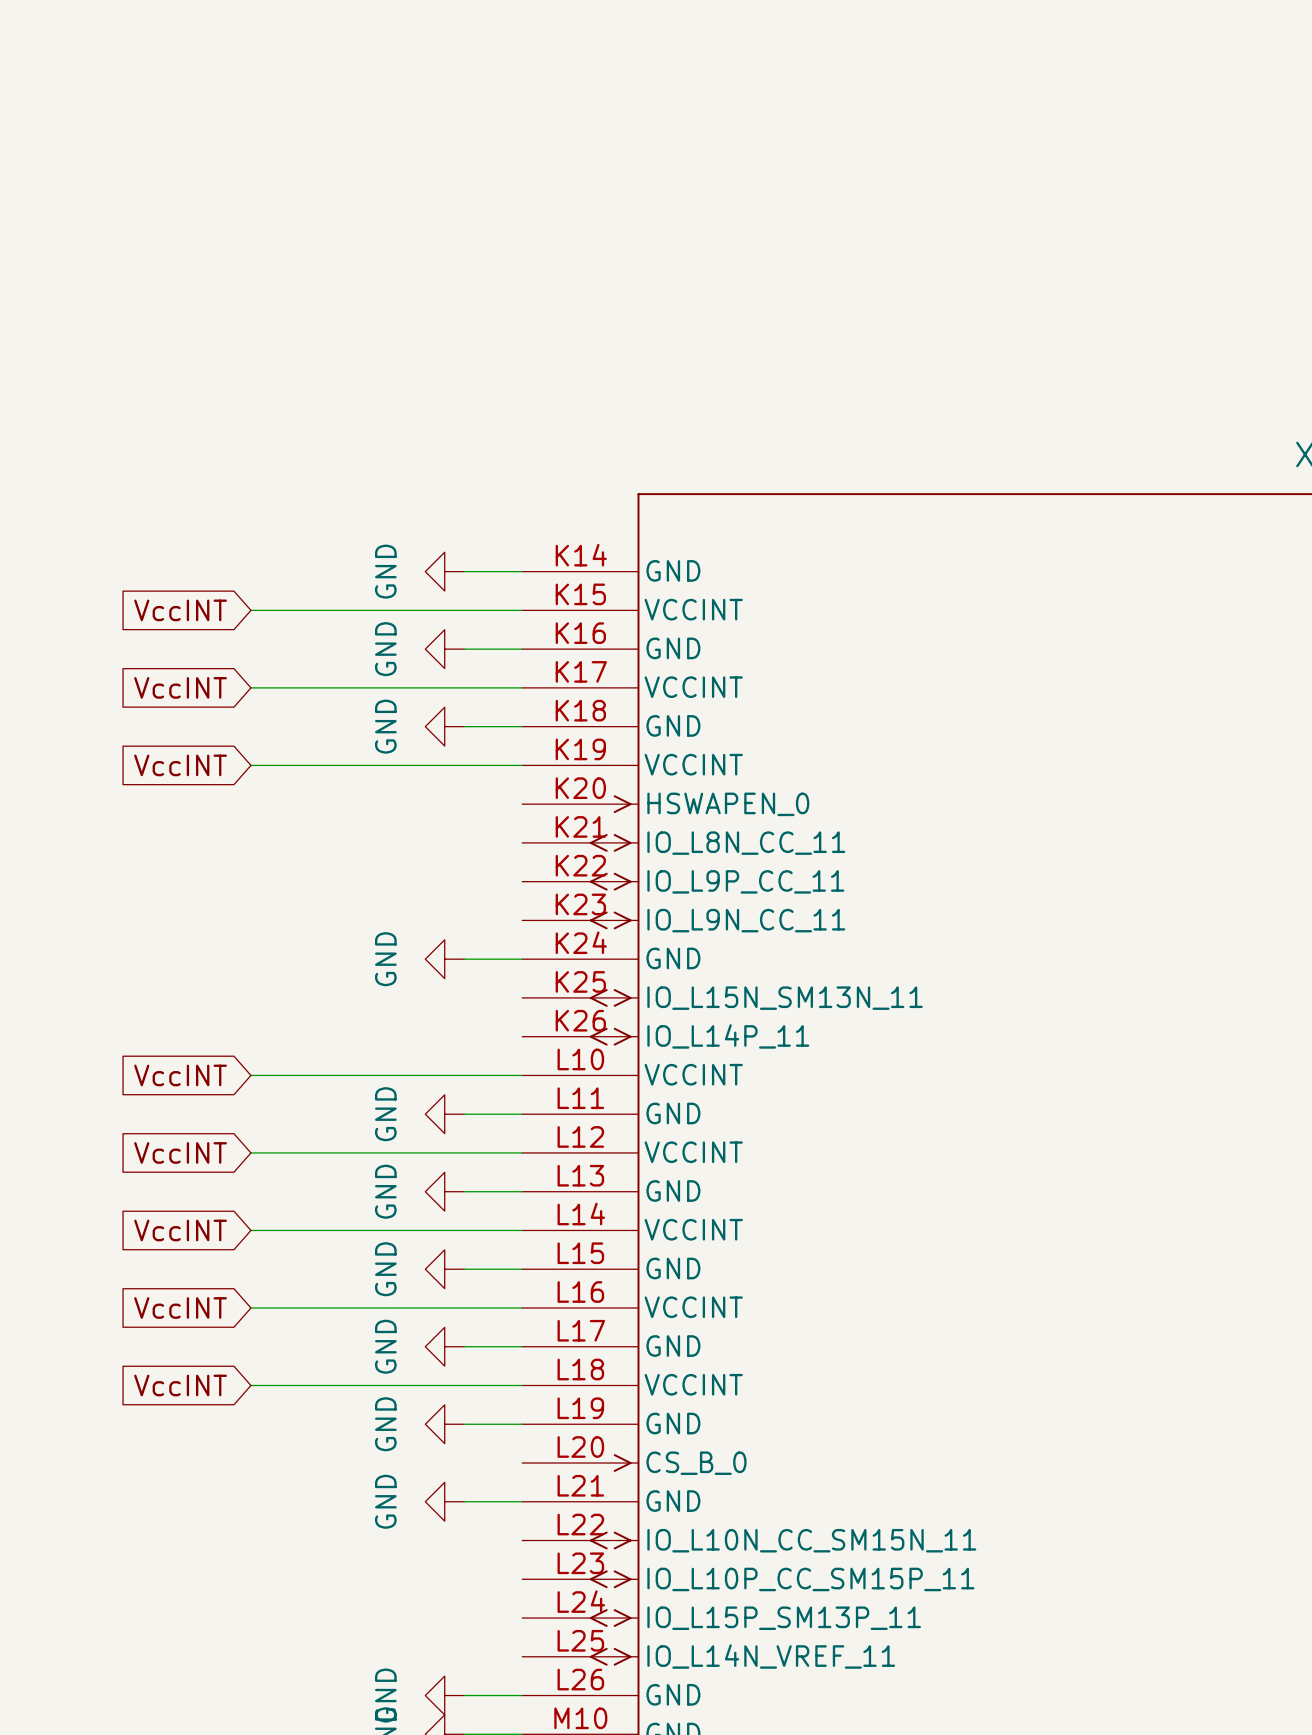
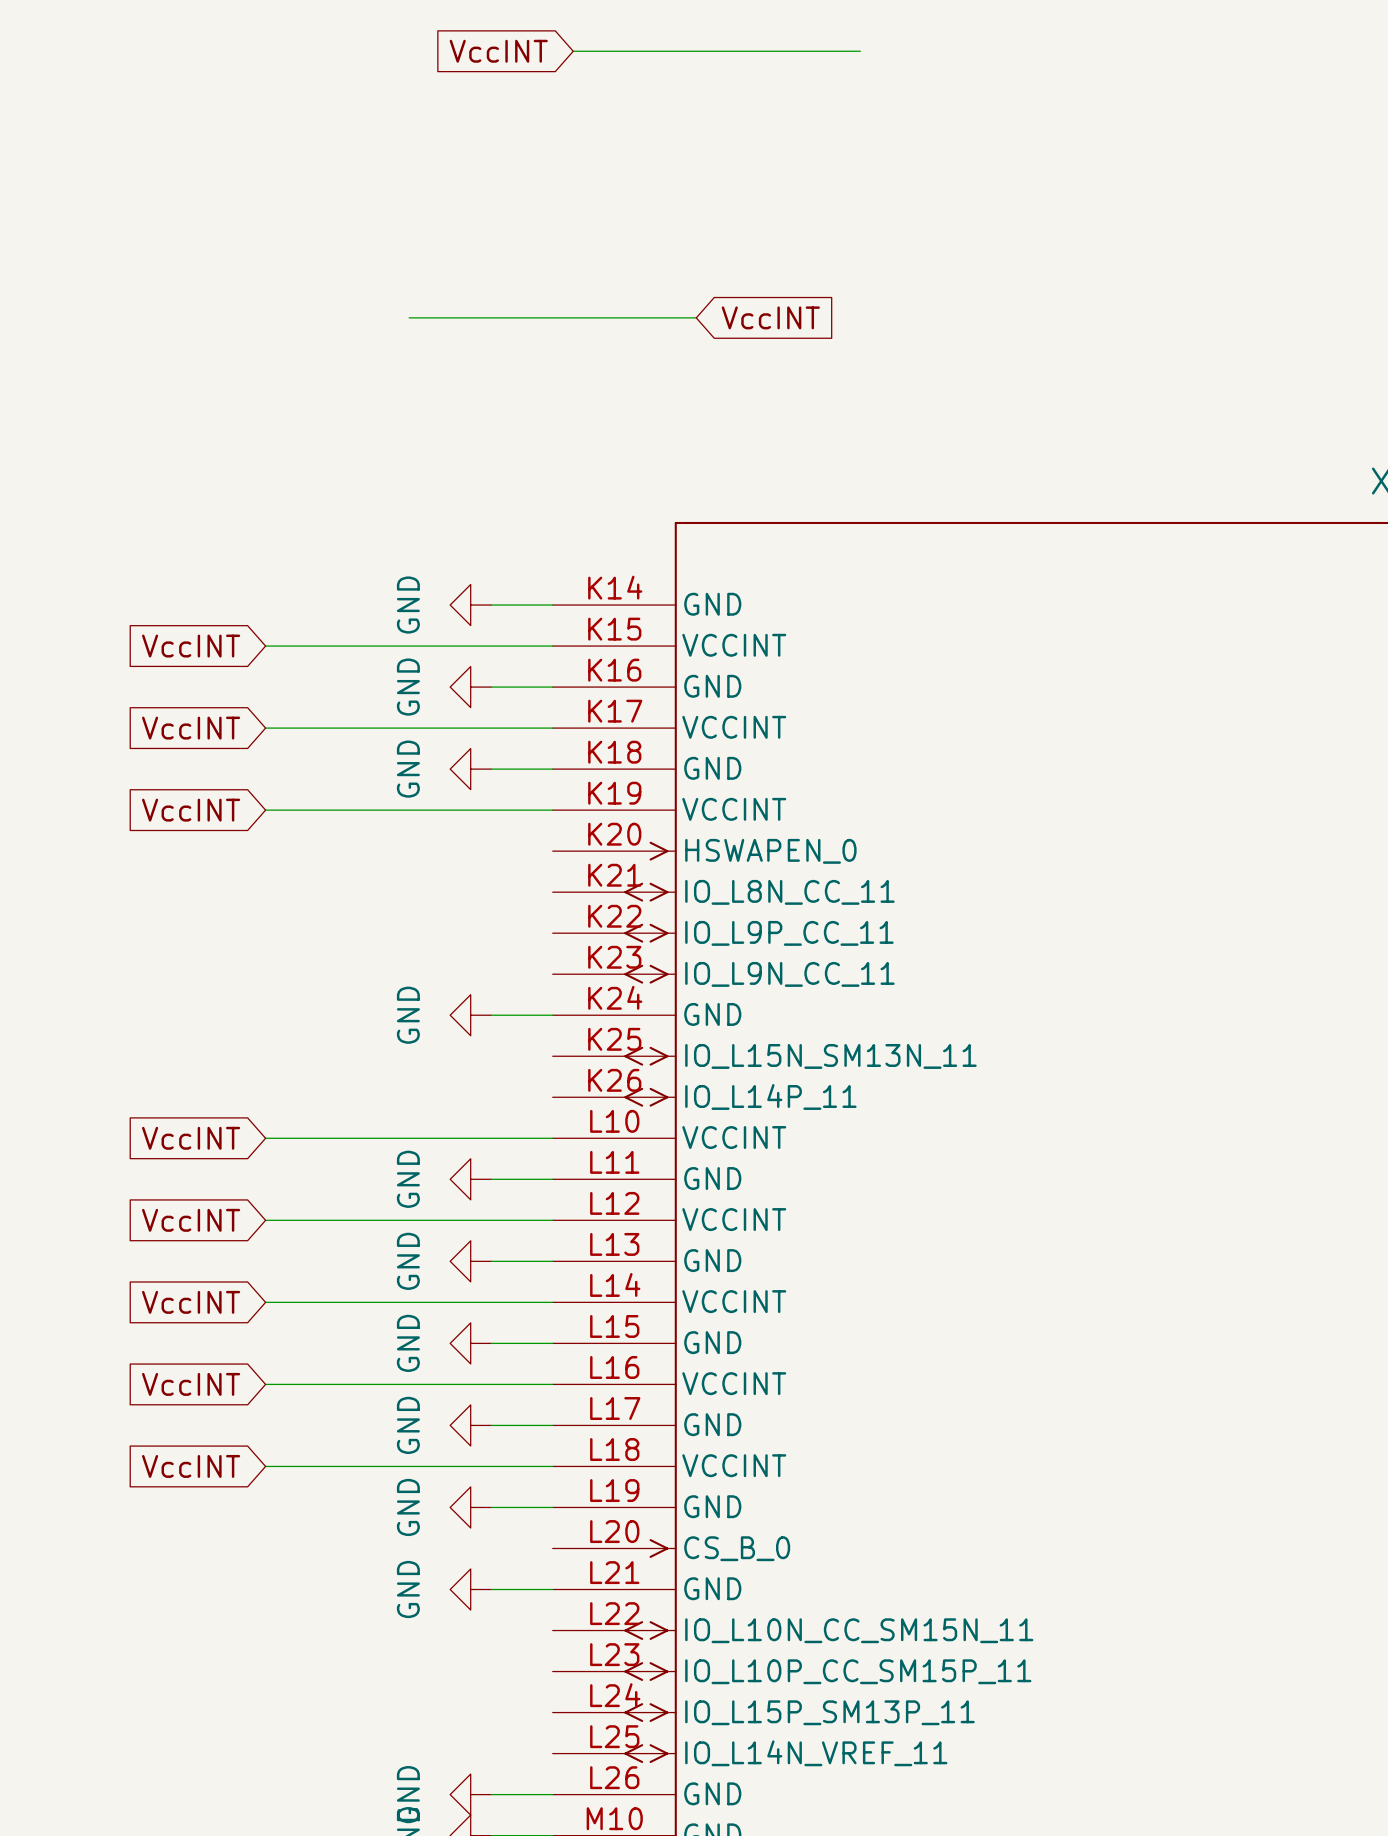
global label: none -> VccINT (498, 51)
wire: none -> (573, 51) (860, 51)
wire: none -> (409, 317) (696, 317)
global label: none -> VccINT (770, 317)

